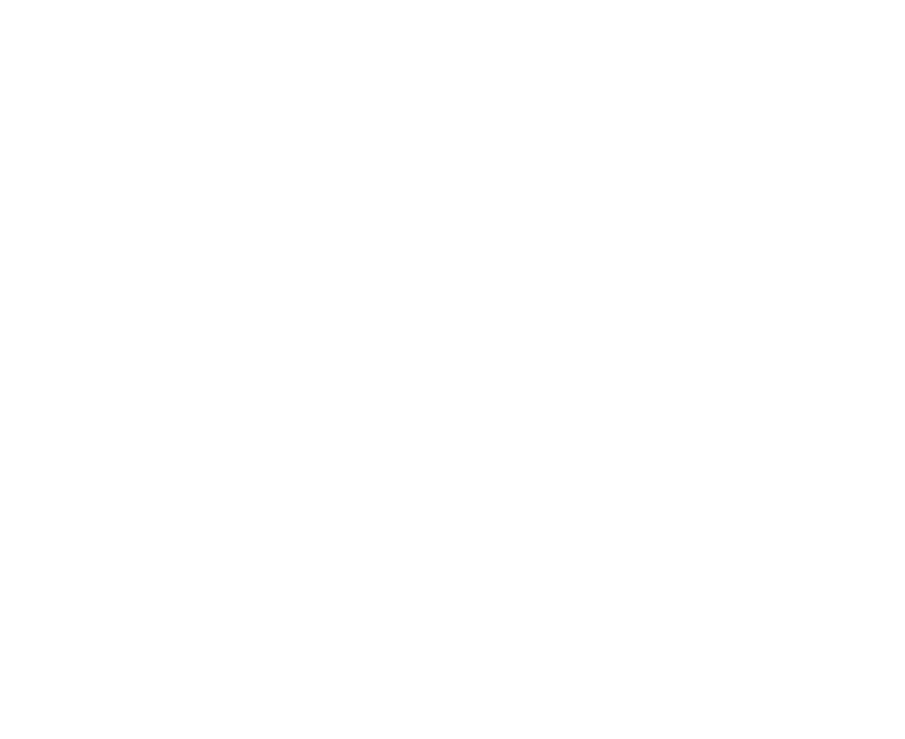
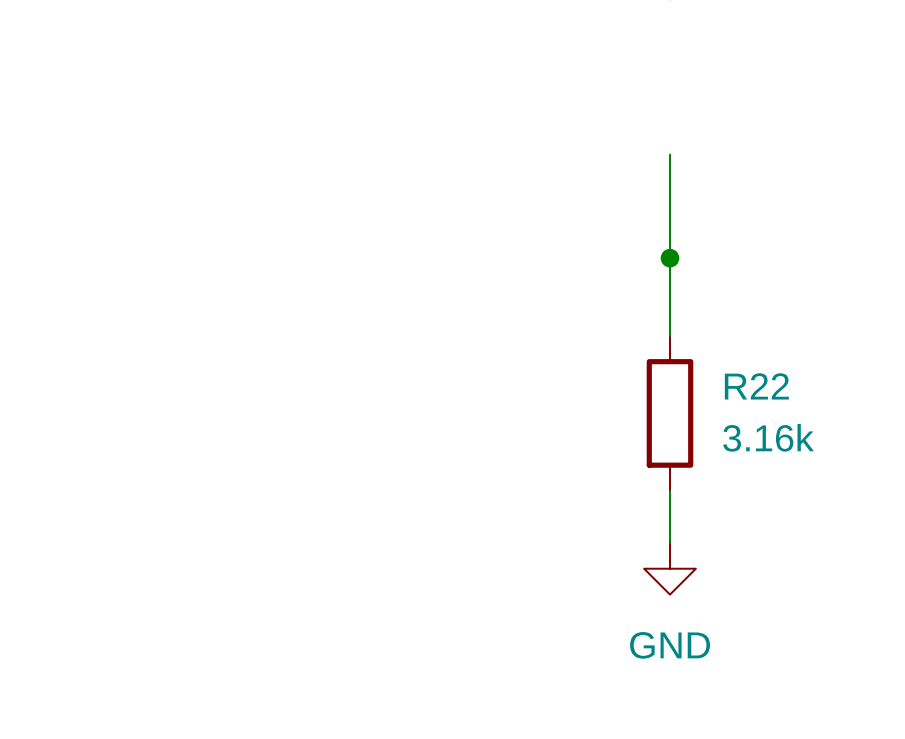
wire: none -> (670, 154) (670, 335)
junction: none -> (670, 258)
R22: none -> 3.16k (670, 413)
wire: none -> (670, 491) (670, 542)
power symbol: none -> GND (670, 568)

